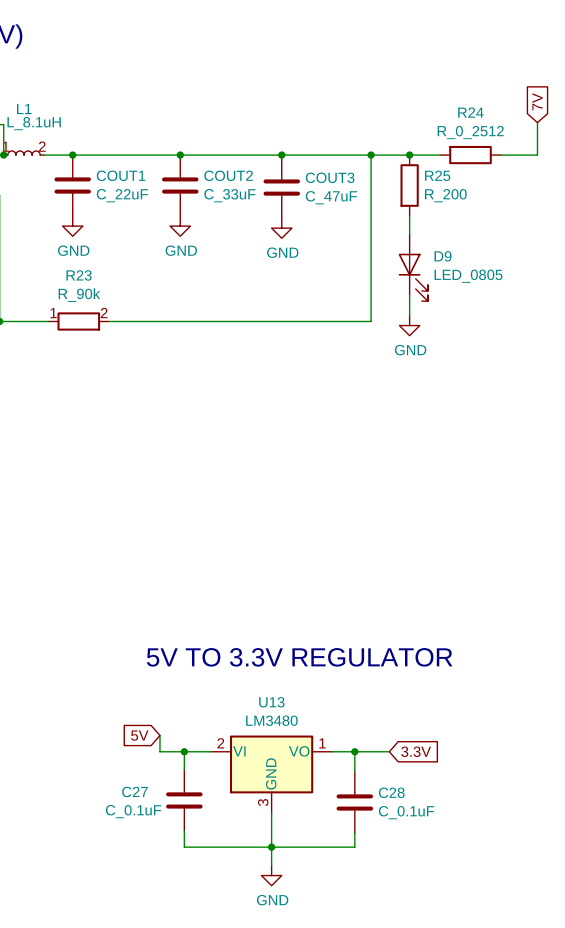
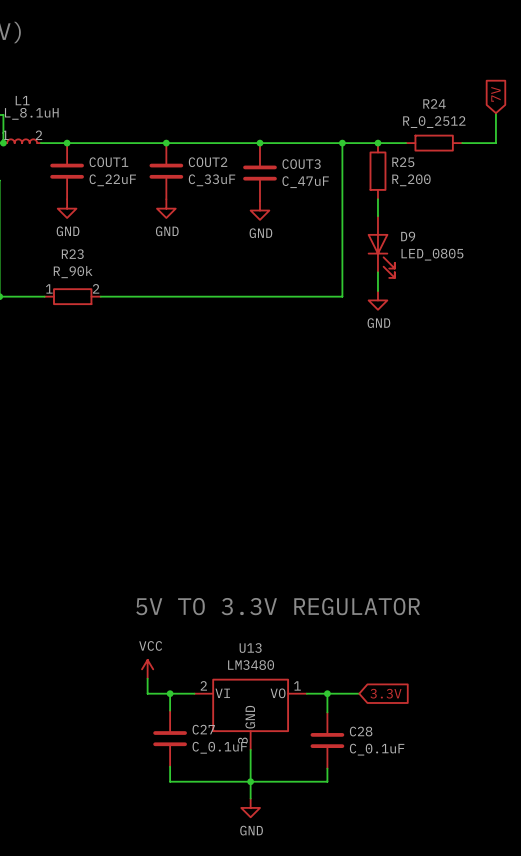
power symbol: none -> VCC (147, 669)
global label: 5V (139, 735) -> none
C27 name position: C27 (134, 791) -> C27 (203, 729)
C27 value position: C_0.1uF (133, 811) -> C_0.1uF (219, 747)

